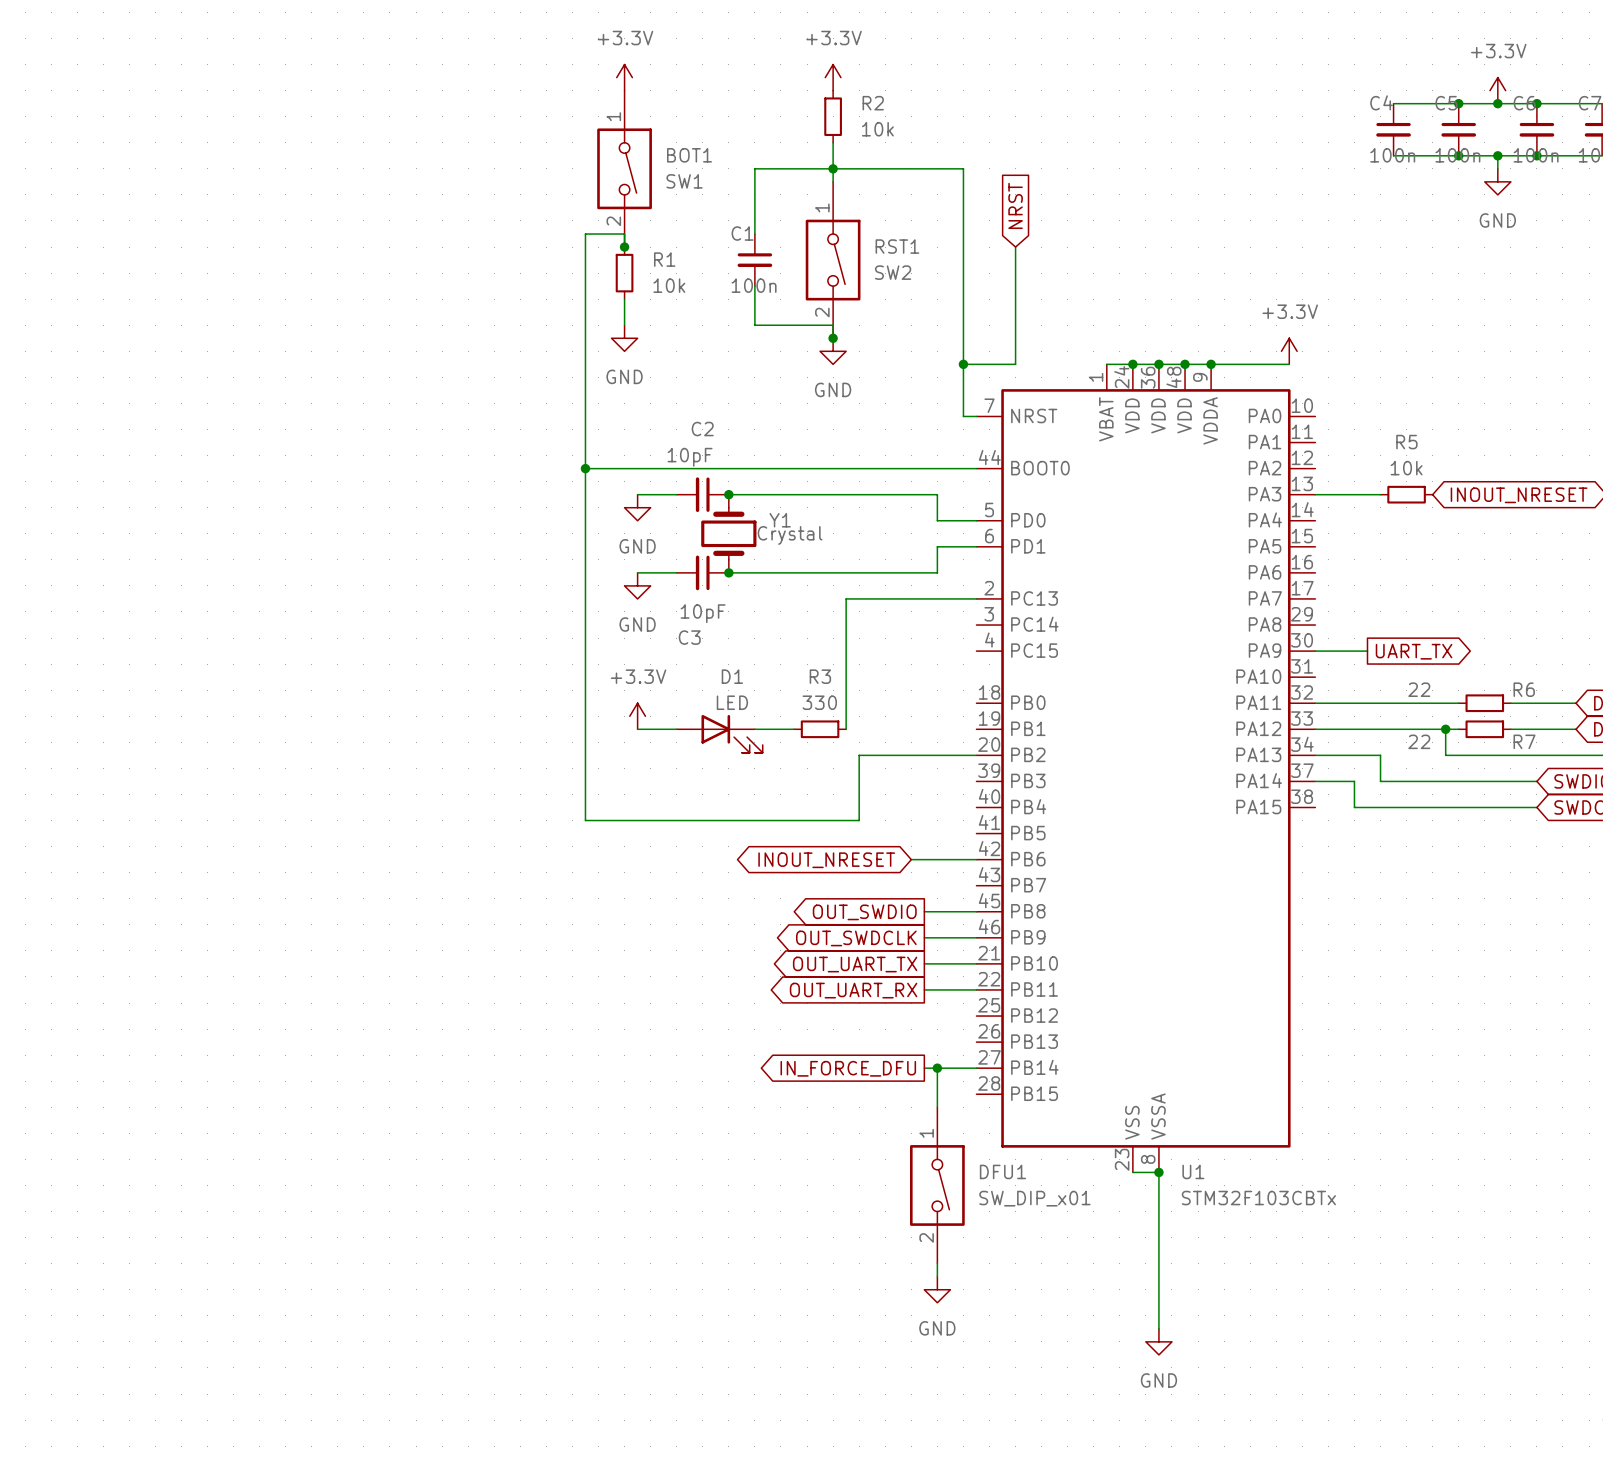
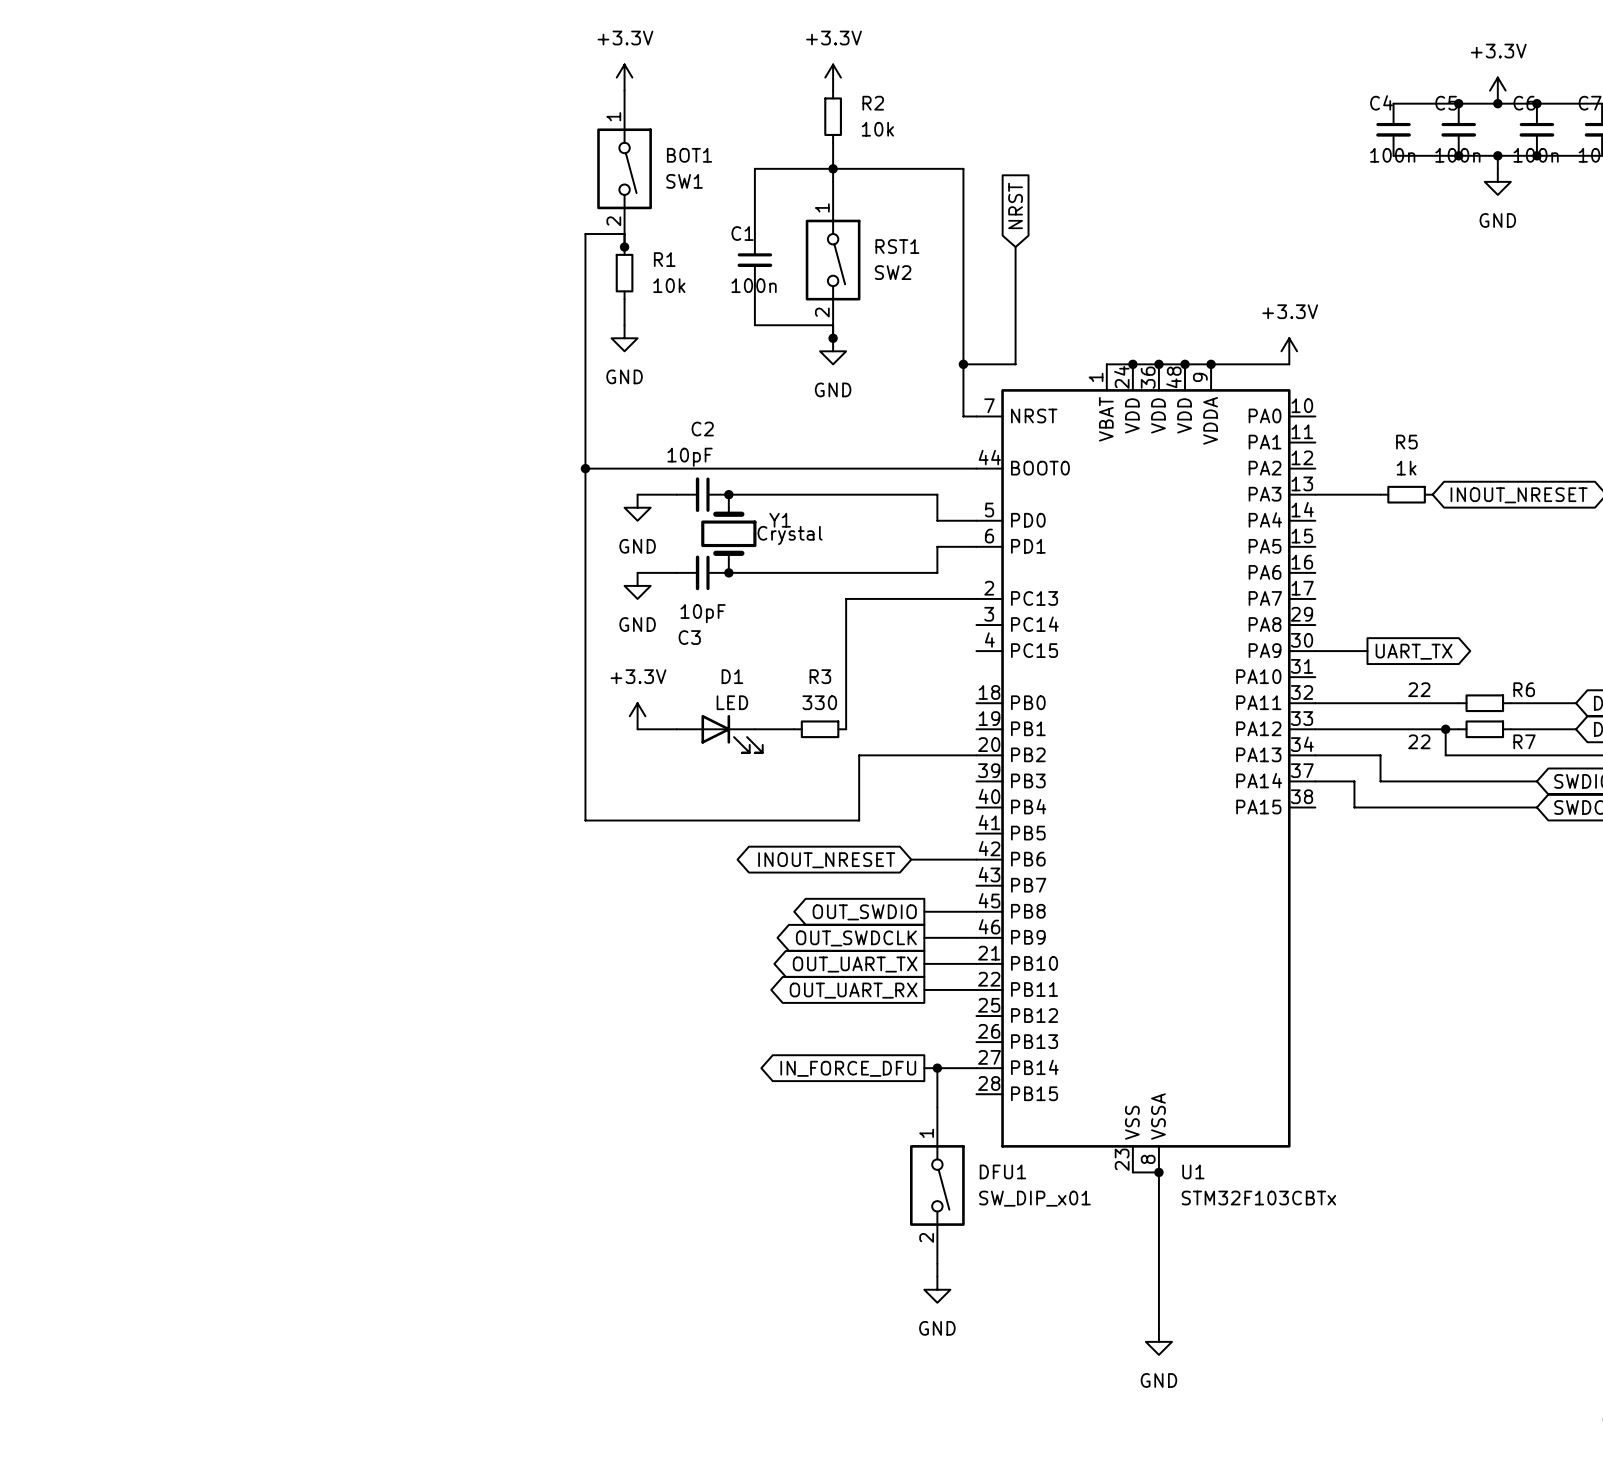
R5 value: 10k (1406, 468) -> 1k (1406, 468)

